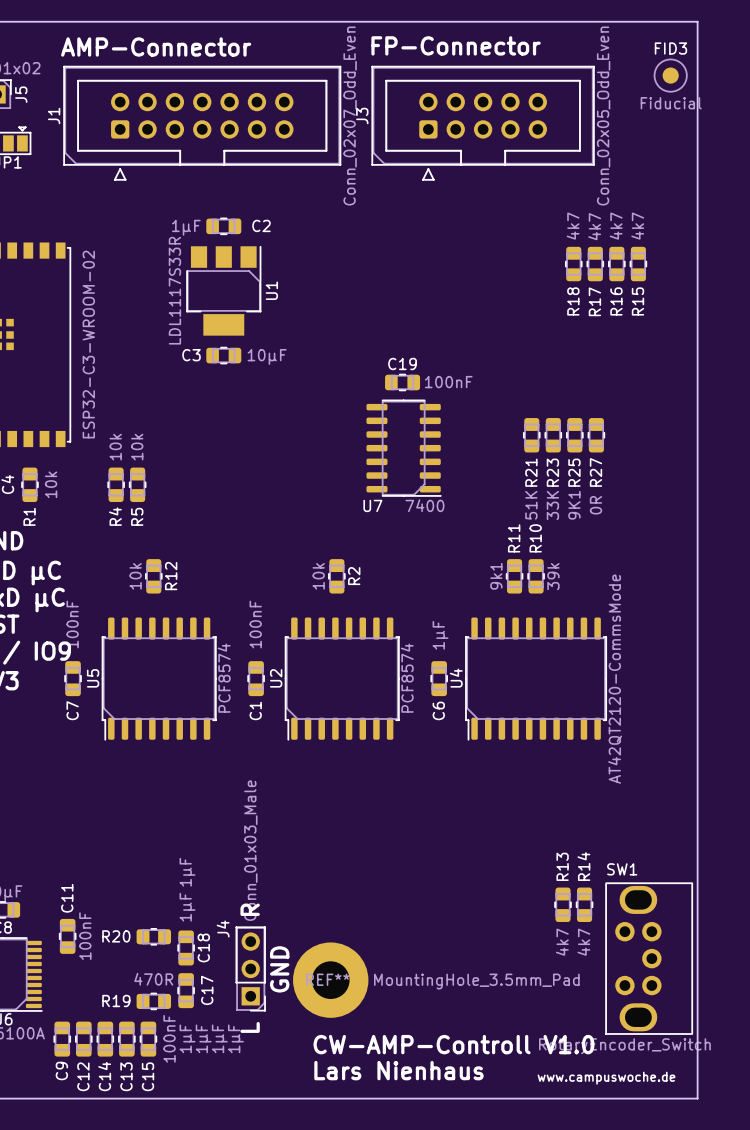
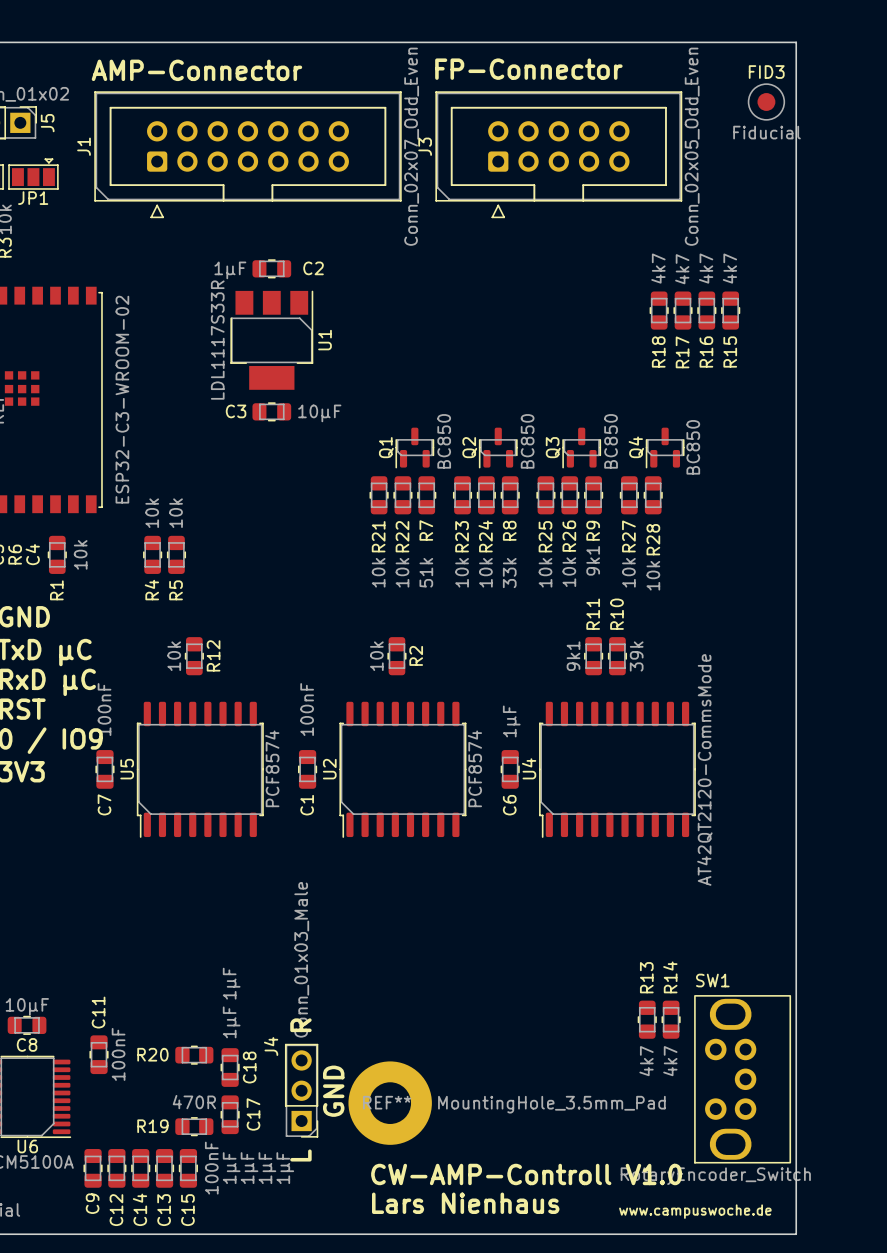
C19: 100nF (402, 382) -> none
Q1: none -> BC850 (414, 447)
Q2: none -> BC850 (498, 447)
Q3: none -> BC850 (581, 447)
Q4: none -> BC850 (665, 447)
R22: none -> 10k (402, 495)
R7: none -> 51k (426, 495)
R24: none -> 10k (486, 495)
R8: none -> 33k (510, 495)
R26: none -> 10k (569, 495)
R9: none -> 9k1 (593, 495)
R28: none -> 10k (653, 495)
R21 position: (531, 435) -> (379, 495)
R23 position: (553, 435) -> (462, 495)
R25 position: (574, 435) -> (545, 495)
R27 position: (596, 435) -> (629, 495)
U7: 7400 (403, 448) -> none
R21 value: 51K (531, 505) -> 10k (378, 572)
R23 value: 33K (552, 505) -> 10k (462, 572)
R25 value: 9K1 (574, 505) -> 10k (545, 572)
R27 value: 0R (595, 505) -> 10k (628, 572)

